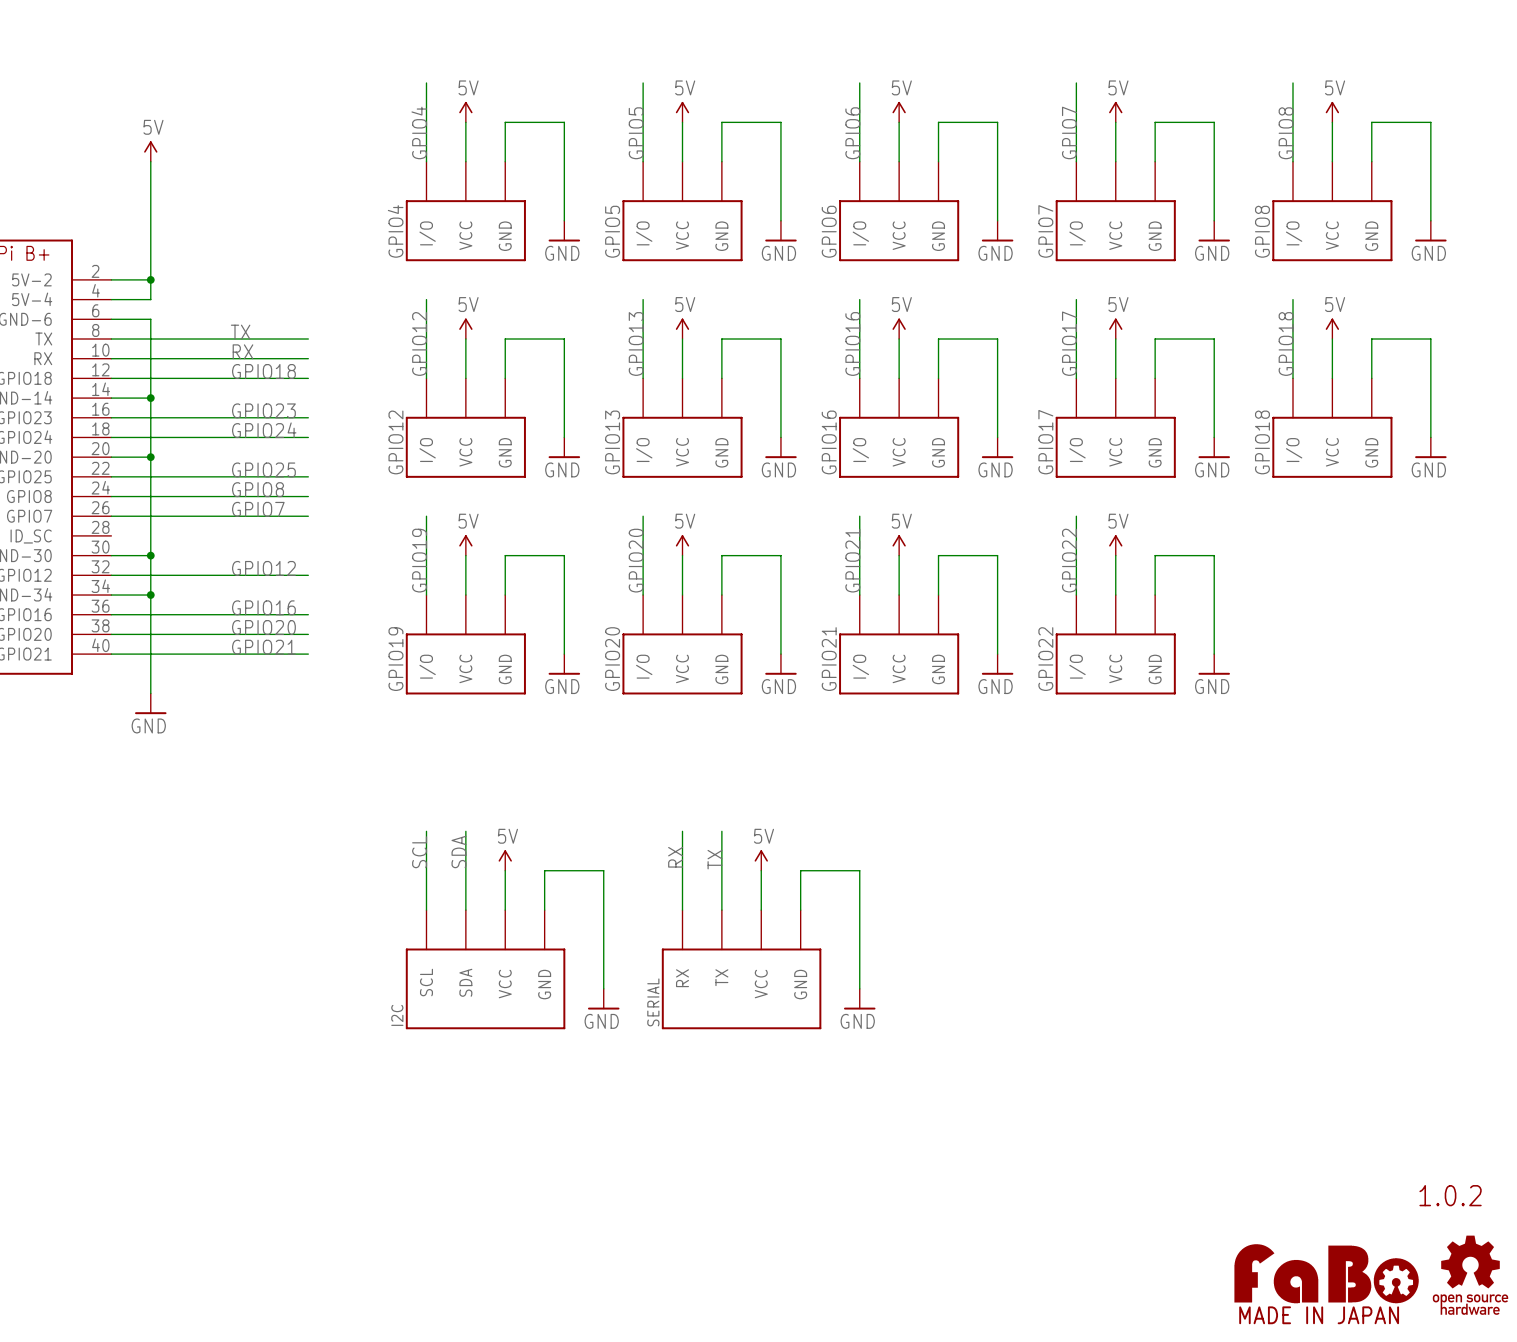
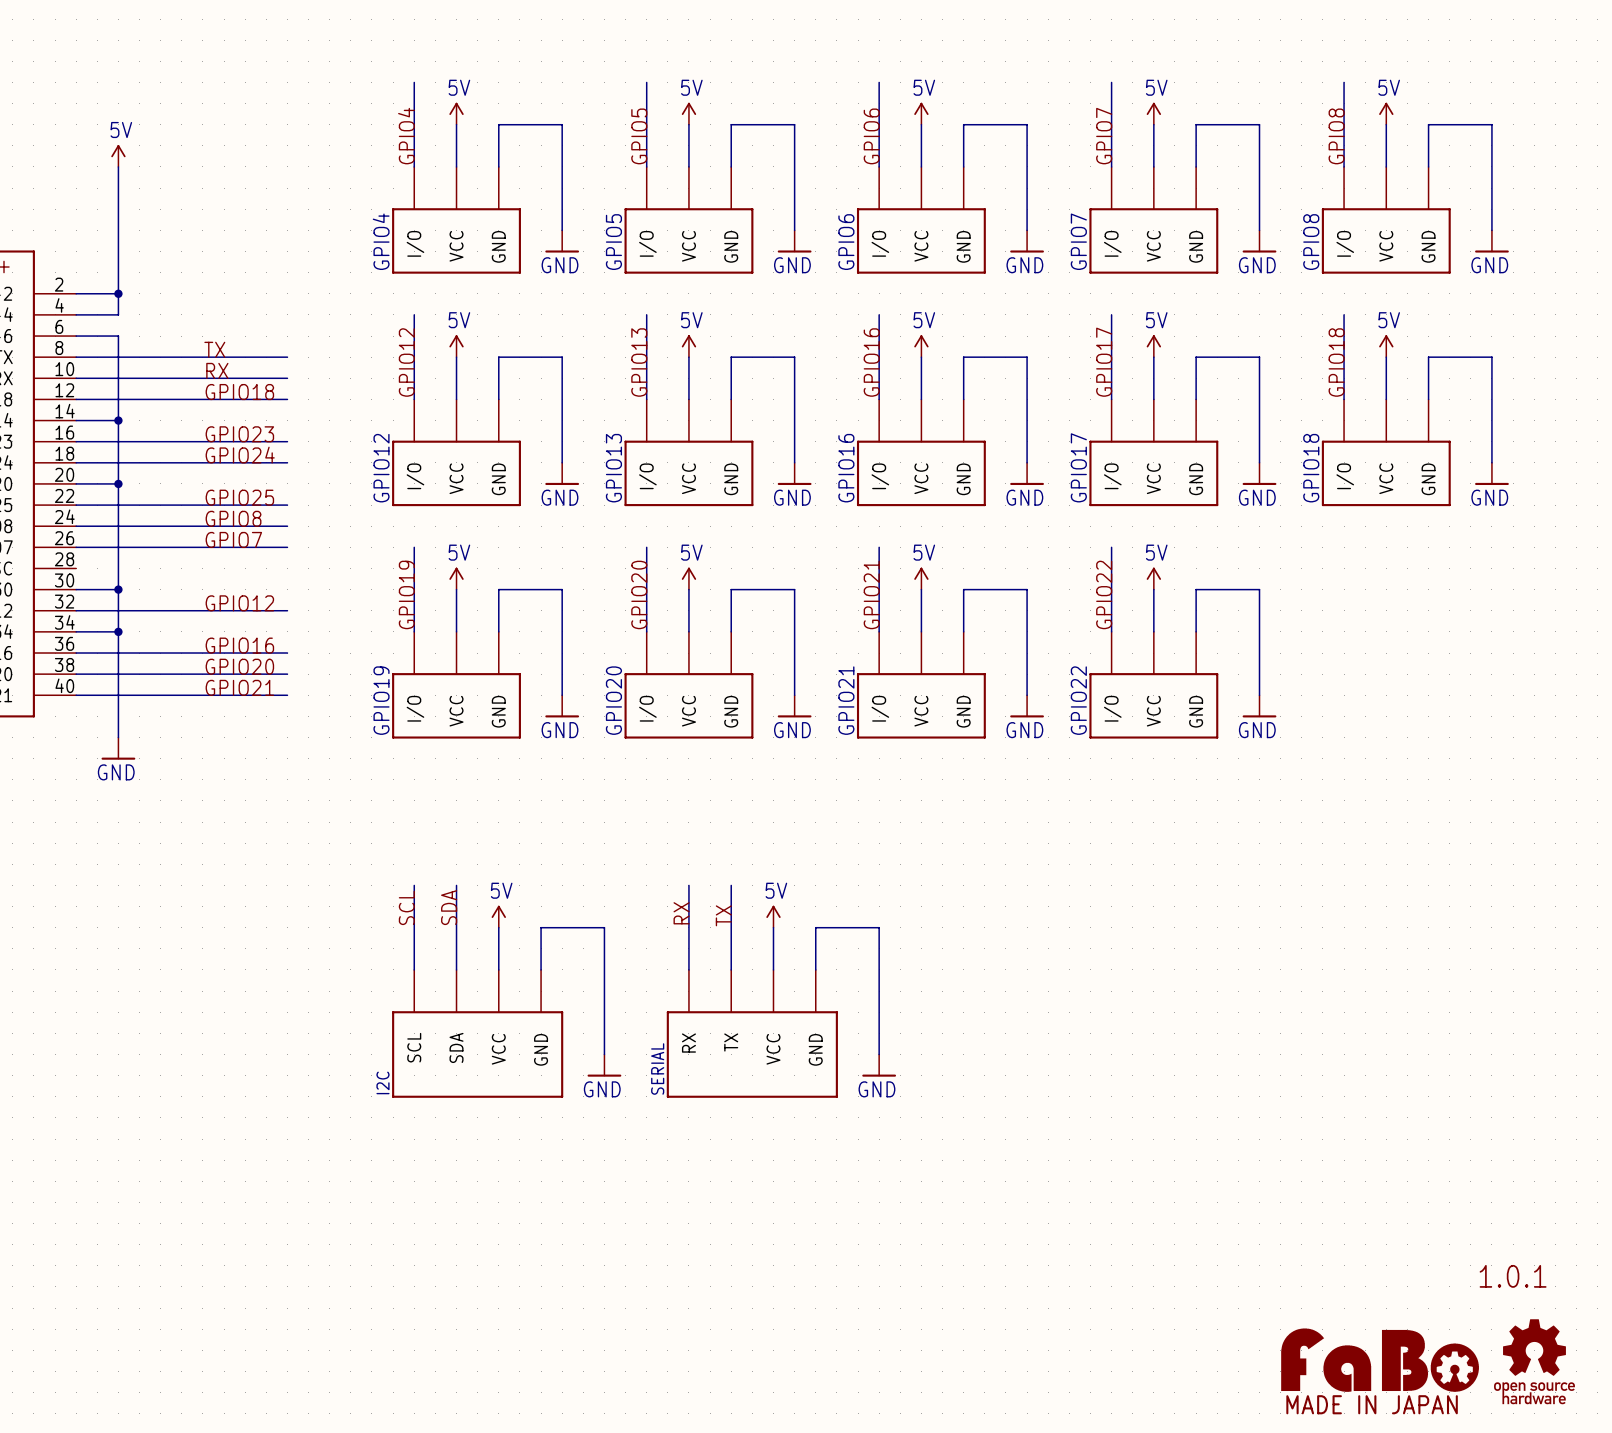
text: 1.0.2 (1450, 1195) -> 1.0.1 (1513, 1276)

